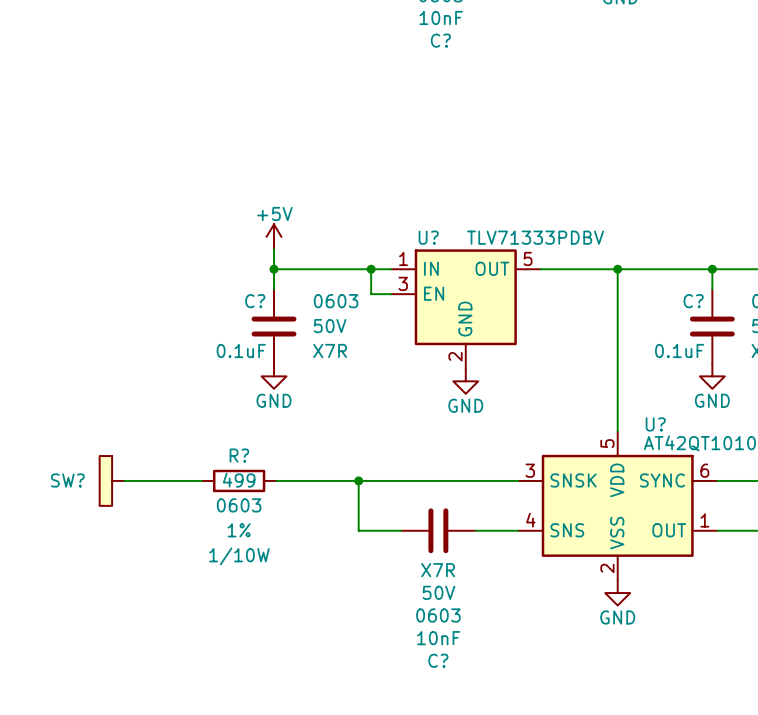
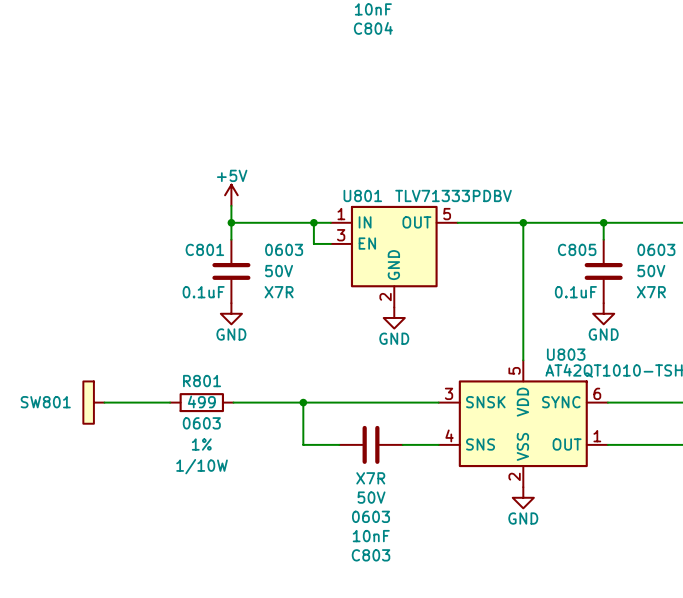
C? name: C? (440, 40) -> C804 (373, 28)
U? name: U? (428, 237) -> U801 (362, 195)
C? name: C? (255, 301) -> C801 (204, 249)
C? name: C? (693, 301) -> C805 (577, 249)
U? name: U? (655, 424) -> U803 (566, 354)
R? name: R? (239, 455) -> R801 (202, 381)
SW? name: SW? (67, 480) -> SW801 (45, 402)
C? name: C? (438, 660) -> C803 (371, 555)

